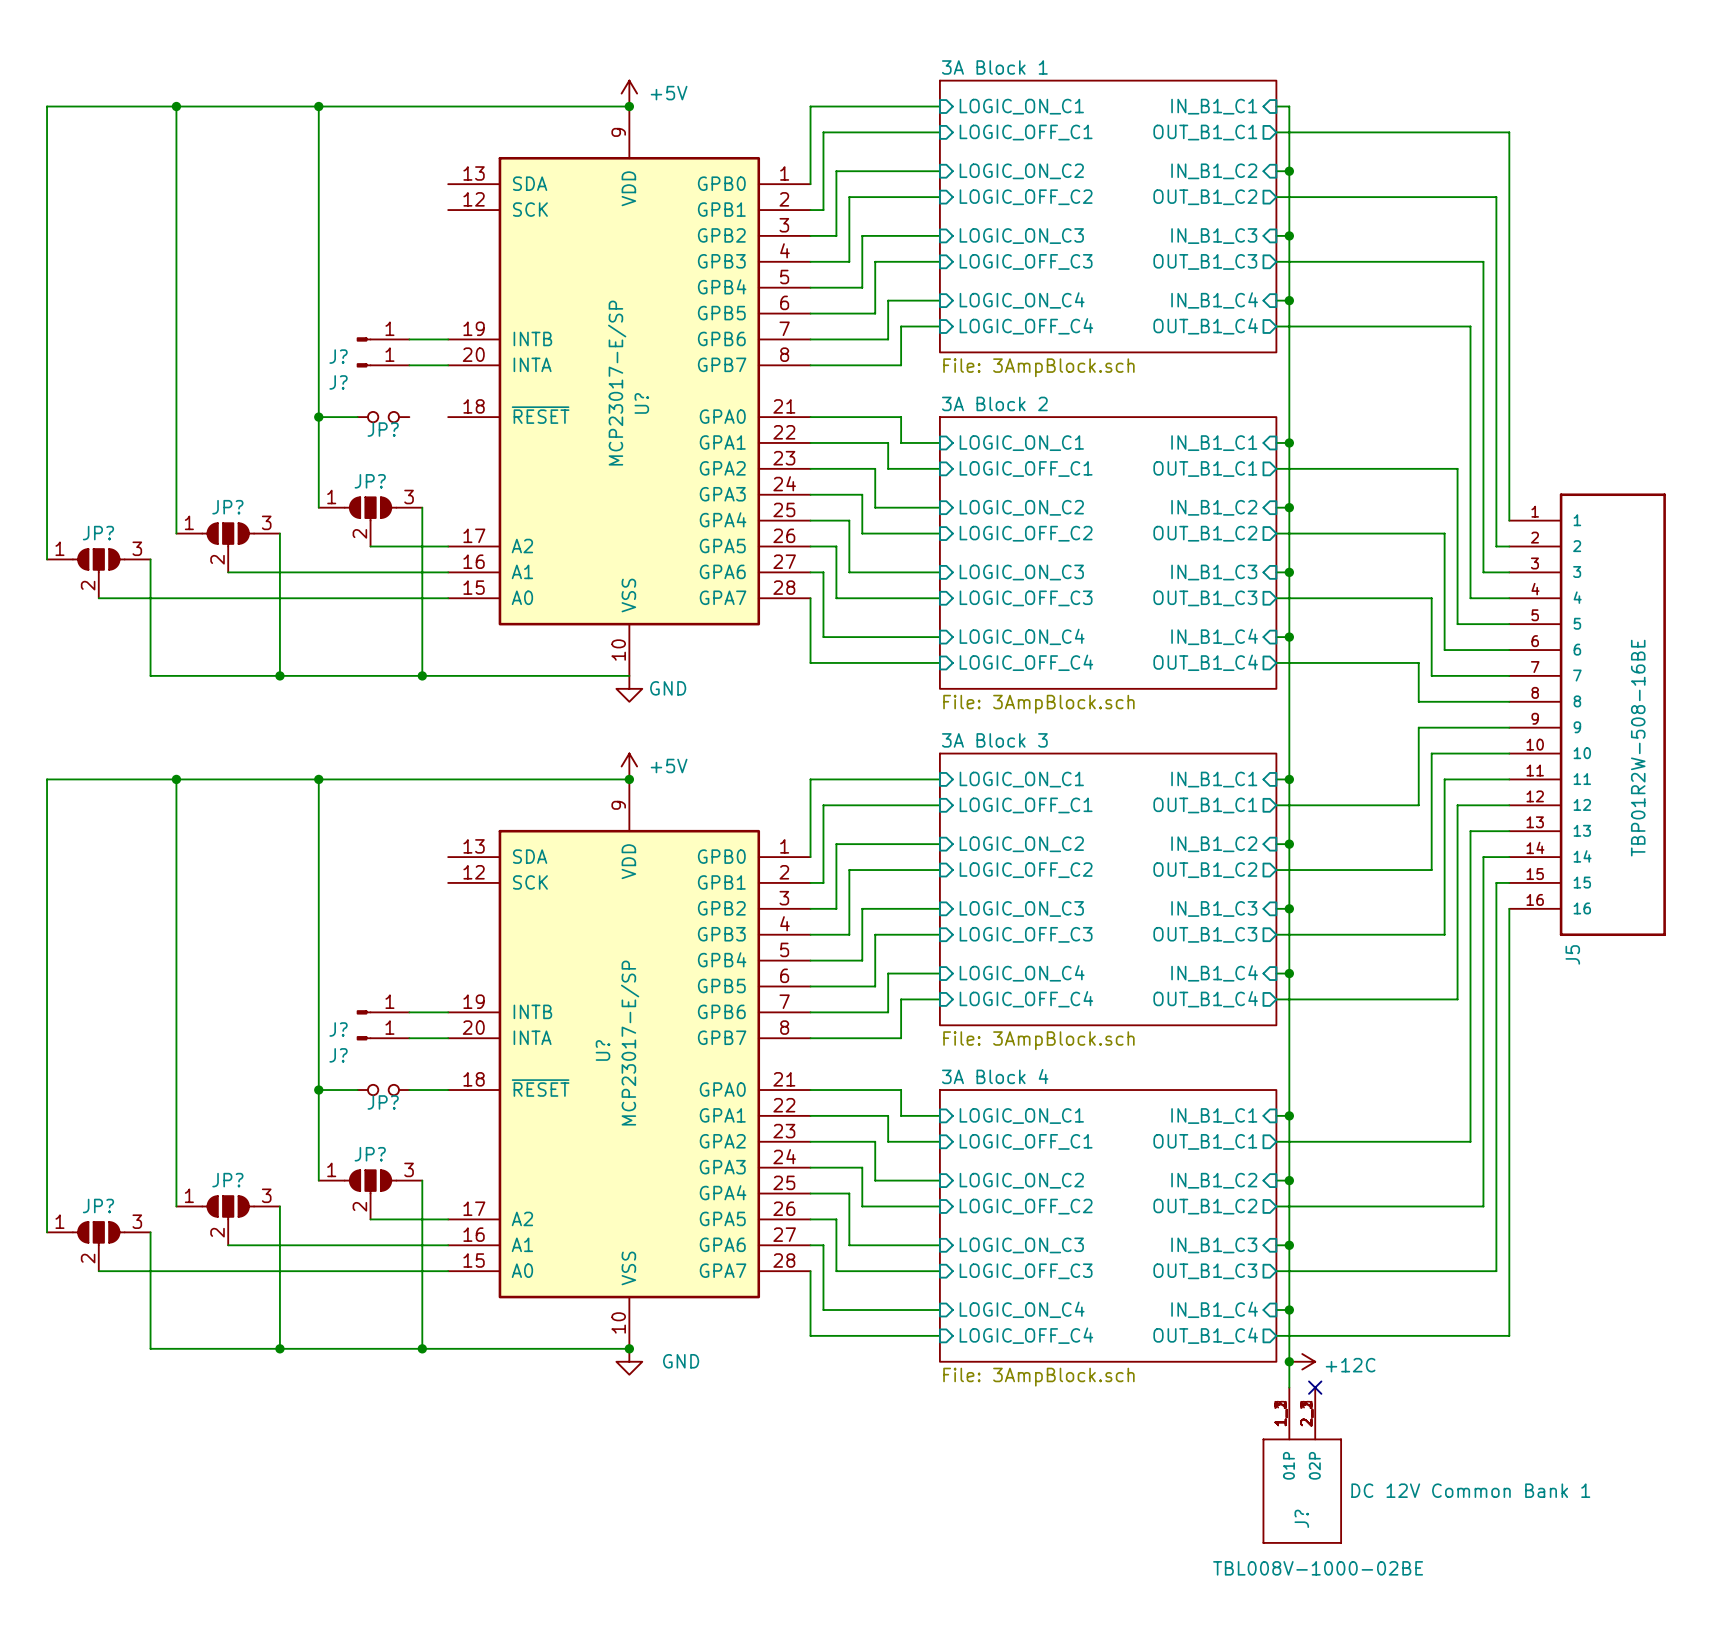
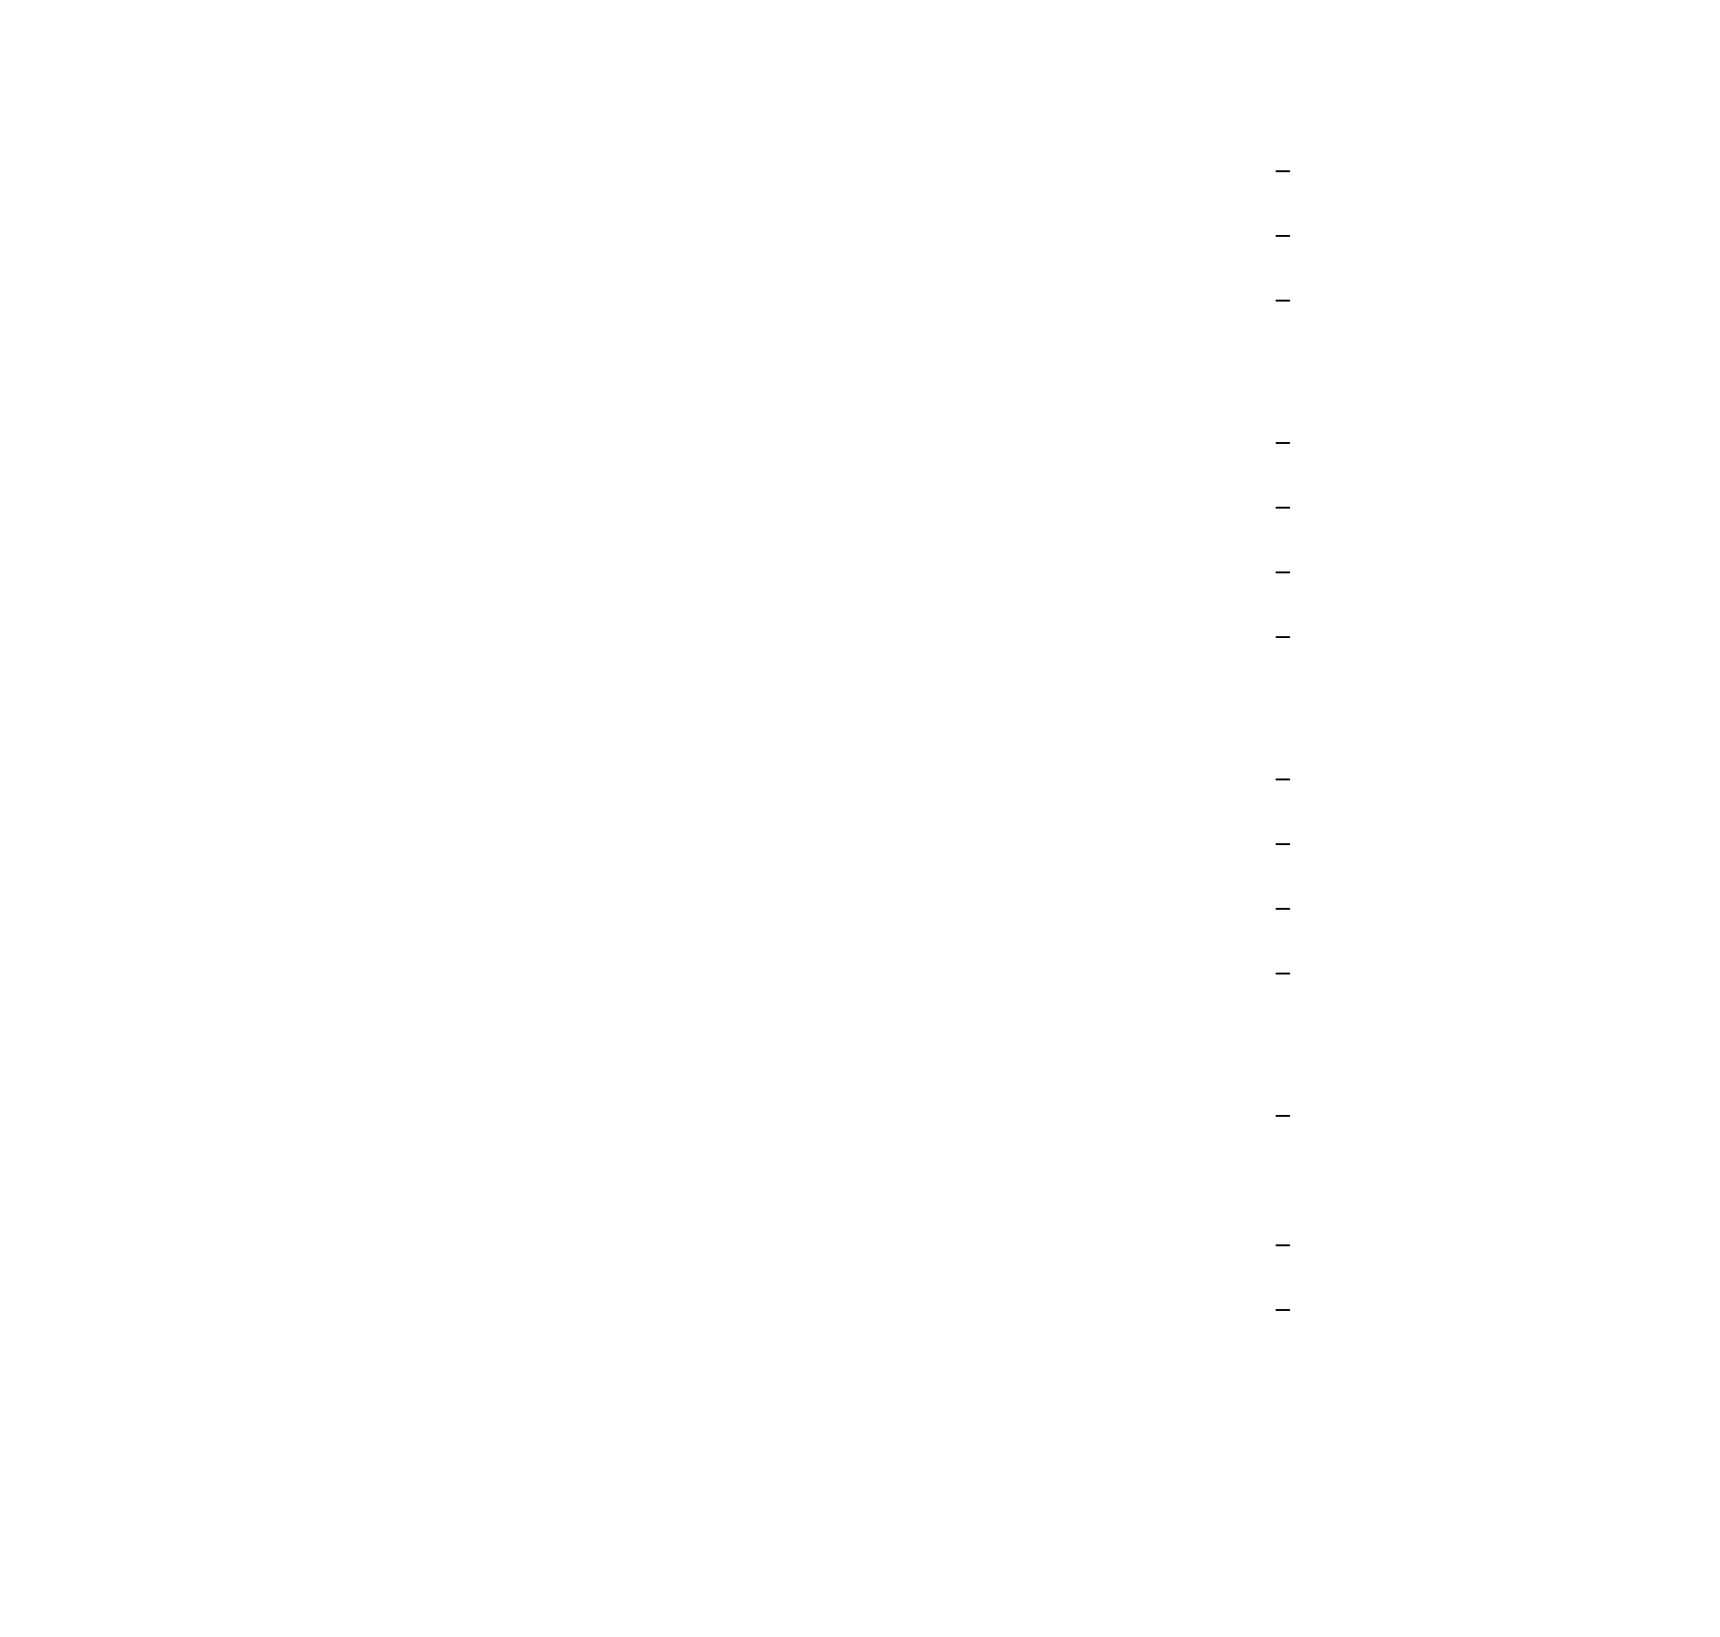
power symbol: +5V (629, 93) -> none
wire: (176, 106) (176, 533) -> none
junction: (176, 106) -> none
wire: (318, 106) (318, 507) -> none
junction: (318, 106) -> none
wire: (629, 106) (47, 106) (47, 559) -> none
junction: (629, 106) -> none
wire: (939, 106) (810, 106) (810, 184) -> none
sheet pin: LOGIC_ON_C1 (1021, 106) -> none
sheet pin: IN_B1_C1 (1214, 106) -> none
wire: (1276, 106) (1289, 106) (1289, 1387) -> none
wire: (939, 132) (823, 132) (823, 210) (810, 210) -> none
sheet pin: LOGIC_OFF_C1 (1026, 132) -> none
sheet pin: OUT_B1_C1 (1205, 132) -> none
wire: (1276, 132) (1509, 132) (1509, 520) -> none
wire: (939, 171) (836, 171) (836, 235) (810, 235) -> none
sheet pin: LOGIC_ON_C2 (1021, 171) -> none
sheet pin: IN_B1_C2 (1214, 171) -> none
junction: (1289, 171) -> none
wire: (939, 197) (849, 197) (849, 261) (810, 261) -> none
sheet pin: LOGIC_OFF_C2 (1026, 197) -> none
sheet pin: OUT_B1_C2 (1205, 197) -> none
wire: (1276, 197) (1496, 197) (1496, 546) (1509, 546) -> none
sheet 3A Block 1: File: 3AmpBlock.sch (1108, 216) -> none
wire: (939, 235) (862, 235) (862, 287) (810, 287) -> none
junction: (1289, 235) -> none
sheet pin: LOGIC_ON_C3 (1021, 236) -> none
sheet pin: IN_B1_C3 (1214, 236) -> none
wire: (939, 261) (875, 261) (875, 313) (810, 313) -> none
sheet pin: LOGIC_OFF_C3 (1026, 261) -> none
sheet pin: OUT_B1_C3 (1205, 261) -> none
wire: (1276, 261) (1483, 261) (1483, 572) (1509, 572) -> none
wire: (939, 300) (888, 300) (888, 339) (810, 339) -> none
sheet pin: LOGIC_ON_C4 (1022, 300) -> none
sheet pin: IN_B1_C4 (1214, 300) -> none
junction: (1289, 300) -> none
wire: (939, 326) (901, 326) (901, 365) (810, 365) -> none
sheet pin: LOGIC_OFF_C4 (1026, 326) -> none
sheet pin: OUT_B1_C4 (1205, 326) -> none
wire: (1276, 326) (1470, 326) (1470, 598) (1509, 598) -> none
J?: (383, 339) -> none
wire: (409, 339) (448, 339) -> none
J?: (383, 365) -> none
wire: (409, 365) (448, 365) -> none
U?: MCP23017-E/SP (629, 391) -> none
wire: (318, 417) (357, 417) -> none
junction: (318, 417) -> none
JP?: (383, 417) -> none
wire: (810, 417) (901, 417) (901, 442) (939, 442) -> none
wire: (810, 442) (888, 442) (888, 468) (939, 468) -> none
junction: (1289, 442) -> none
sheet pin: LOGIC_ON_C1 (1021, 443) -> none
sheet pin: IN_B1_C1 (1214, 443) -> none
wire: (810, 468) (875, 468) (875, 507) (939, 507) -> none
sheet pin: LOGIC_OFF_C1 (1026, 468) -> none
sheet pin: OUT_B1_C1 (1205, 468) -> none
wire: (1276, 468) (1457, 468) (1457, 624) (1509, 624) -> none
wire: (810, 494) (862, 494) (862, 533) (939, 533) -> none
wire: (422, 507) (422, 675) -> none
sheet pin: LOGIC_ON_C2 (1021, 507) -> none
sheet pin: IN_B1_C2 (1214, 507) -> none
junction: (1289, 507) -> none
wire: (810, 520) (849, 520) (849, 572) (939, 572) -> none
JP?: (370, 521) -> none
wire: (279, 533) (279, 675) -> none
sheet pin: LOGIC_OFF_C2 (1026, 533) -> none
sheet pin: OUT_B1_C2 (1205, 533) -> none
wire: (1276, 533) (1444, 533) (1444, 650) (1509, 650) -> none
wire: (370, 546) (448, 546) -> none
wire: (810, 546) (836, 546) (836, 598) (939, 598) -> none
JP?: (228, 547) -> none
sheet 3A Block 2: File: 3AmpBlock.sch (1108, 552) -> none
wire: (150, 559) (150, 675) (629, 675) -> none
wire: (228, 572) (448, 572) -> none
wire: (810, 572) (823, 572) (823, 637) (939, 637) -> none
sheet pin: LOGIC_ON_C3 (1021, 572) -> none
sheet pin: IN_B1_C3 (1214, 572) -> none
junction: (1289, 572) -> none
JP?: (98, 573) -> none
wire: (98, 598) (448, 598) -> none
wire: (810, 598) (810, 662) (939, 662) -> none
sheet pin: LOGIC_OFF_C3 (1026, 598) -> none
sheet pin: OUT_B1_C3 (1205, 598) -> none
wire: (1276, 598) (1431, 598) (1431, 675) (1509, 675) -> none
sheet pin: LOGIC_ON_C4 (1022, 636) -> none
sheet pin: IN_B1_C4 (1214, 636) -> none
junction: (1289, 637) -> none
sheet pin: LOGIC_OFF_C4 (1026, 662) -> none
sheet pin: OUT_B1_C4 (1205, 662) -> none
wire: (1276, 662) (1418, 662) (1418, 701) (1509, 701) -> none
junction: (279, 675) -> none
junction: (422, 675) -> none
power symbol: GND (629, 688) -> none
J5: TBP01R2W-508-16BE (1587, 714) -> none
wire: (1509, 727) (1418, 727) (1418, 805) (1276, 805) -> none
wire: (1509, 753) (1431, 753) (1431, 870) (1276, 870) -> none
power symbol: +5V (629, 766) -> none
wire: (176, 779) (176, 1206) -> none
junction: (176, 779) -> none
wire: (318, 779) (318, 1180) -> none
junction: (318, 779) -> none
wire: (629, 779) (47, 779) (47, 1232) -> none
junction: (629, 779) -> none
wire: (939, 779) (810, 779) (810, 857) -> none
sheet pin: LOGIC_ON_C1 (1021, 779) -> none
sheet pin: IN_B1_C1 (1214, 779) -> none
junction: (1289, 779) -> none
wire: (1509, 779) (1444, 779) (1444, 934) (1276, 934) -> none
wire: (939, 805) (823, 805) (823, 882) (810, 882) -> none
sheet pin: LOGIC_OFF_C1 (1026, 805) -> none
sheet pin: OUT_B1_C1 (1205, 805) -> none
wire: (1509, 805) (1457, 805) (1457, 999) (1276, 999) -> none
wire: (1509, 831) (1470, 831) (1470, 1141) (1276, 1141) -> none
wire: (939, 844) (836, 844) (836, 908) (810, 908) -> none
sheet pin: LOGIC_ON_C2 (1021, 844) -> none
sheet pin: IN_B1_C2 (1214, 844) -> none
junction: (1289, 844) -> none
wire: (1509, 857) (1483, 857) (1483, 1206) (1276, 1206) -> none
wire: (939, 870) (849, 870) (849, 934) (810, 934) -> none
sheet pin: LOGIC_OFF_C2 (1026, 870) -> none
sheet pin: OUT_B1_C2 (1205, 870) -> none
wire: (1509, 882) (1496, 882) (1496, 1271) (1276, 1271) -> none
sheet 3A Block 3: File: 3AmpBlock.sch (1108, 889) -> none
wire: (939, 908) (862, 908) (862, 960) (810, 960) -> none
sheet pin: LOGIC_ON_C3 (1021, 908) -> none
sheet pin: IN_B1_C3 (1214, 908) -> none
junction: (1289, 908) -> none
wire: (1509, 908) (1509, 1335) (1276, 1335) -> none
wire: (939, 934) (875, 934) (875, 986) (810, 986) -> none
sheet pin: LOGIC_OFF_C3 (1026, 934) -> none
sheet pin: OUT_B1_C3 (1205, 934) -> none
wire: (939, 973) (888, 973) (888, 1012) (810, 1012) -> none
sheet pin: LOGIC_ON_C4 (1022, 973) -> none
sheet pin: IN_B1_C4 (1214, 973) -> none
junction: (1289, 973) -> none
wire: (939, 999) (901, 999) (901, 1038) (810, 1038) -> none
sheet pin: LOGIC_OFF_C4 (1026, 999) -> none
sheet pin: OUT_B1_C4 (1205, 999) -> none
J?: (383, 1012) -> none
wire: (409, 1012) (448, 1012) -> none
J?: (383, 1038) -> none
wire: (409, 1038) (448, 1038) -> none
U?: MCP23017-E/SP (629, 1064) -> none
wire: (318, 1090) (357, 1090) -> none
junction: (318, 1090) -> none
JP?: (383, 1090) -> none
wire: (409, 1090) (448, 1090) -> none
wire: (810, 1090) (901, 1090) (901, 1115) (939, 1115) -> none
wire: (810, 1115) (888, 1115) (888, 1141) (939, 1141) -> none
junction: (1289, 1115) -> none
sheet pin: LOGIC_ON_C1 (1021, 1116) -> none
sheet pin: IN_B1_C1 (1214, 1116) -> none
wire: (810, 1141) (875, 1141) (875, 1180) (939, 1180) -> none
sheet pin: LOGIC_OFF_C1 (1026, 1141) -> none
sheet pin: OUT_B1_C1 (1205, 1141) -> none
wire: (810, 1167) (862, 1167) (862, 1206) (939, 1206) -> none
wire: (422, 1180) (422, 1348) -> none
sheet pin: LOGIC_ON_C2 (1021, 1180) -> none
sheet pin: IN_B1_C2 (1214, 1180) -> none
wire: (1276, 1180) (1289, 1180) -> none
junction: (1289, 1180) -> none
wire: (810, 1193) (849, 1193) (849, 1245) (939, 1245) -> none
JP?: (370, 1194) -> none
wire: (279, 1206) (279, 1348) -> none
sheet pin: LOGIC_OFF_C2 (1026, 1206) -> none
sheet pin: OUT_B1_C2 (1205, 1206) -> none
wire: (370, 1219) (448, 1219) -> none
wire: (810, 1219) (836, 1219) (836, 1271) (939, 1271) -> none
JP?: (228, 1220) -> none
sheet 3A Block 4: File: 3AmpBlock.sch (1108, 1225) -> none
wire: (150, 1232) (150, 1348) (629, 1348) -> none
wire: (228, 1245) (448, 1245) -> none
wire: (810, 1245) (823, 1245) (823, 1310) (939, 1310) -> none
sheet pin: LOGIC_ON_C3 (1021, 1245) -> none
sheet pin: IN_B1_C3 (1214, 1245) -> none
junction: (1289, 1245) -> none
JP?: (98, 1246) -> none
wire: (98, 1271) (448, 1271) -> none
wire: (810, 1271) (810, 1335) (939, 1335) -> none
sheet pin: LOGIC_OFF_C3 (1026, 1271) -> none
sheet pin: OUT_B1_C3 (1205, 1271) -> none
sheet pin: LOGIC_ON_C4 (1022, 1309) -> none
sheet pin: IN_B1_C4 (1214, 1309) -> none
junction: (1289, 1310) -> none
sheet pin: LOGIC_OFF_C4 (1026, 1335) -> none
sheet pin: OUT_B1_C4 (1205, 1335) -> none
junction: (279, 1348) -> none
junction: (422, 1348) -> none
junction: (629, 1348) -> none
power symbol: GND (629, 1361) -> none
junction: (1289, 1361) -> none
power symbol: +12C (1302, 1361) -> none
no-connect mark: (1315, 1387) -> none
J?: TBL008V-1000-02BE (1302, 1465) -> none

